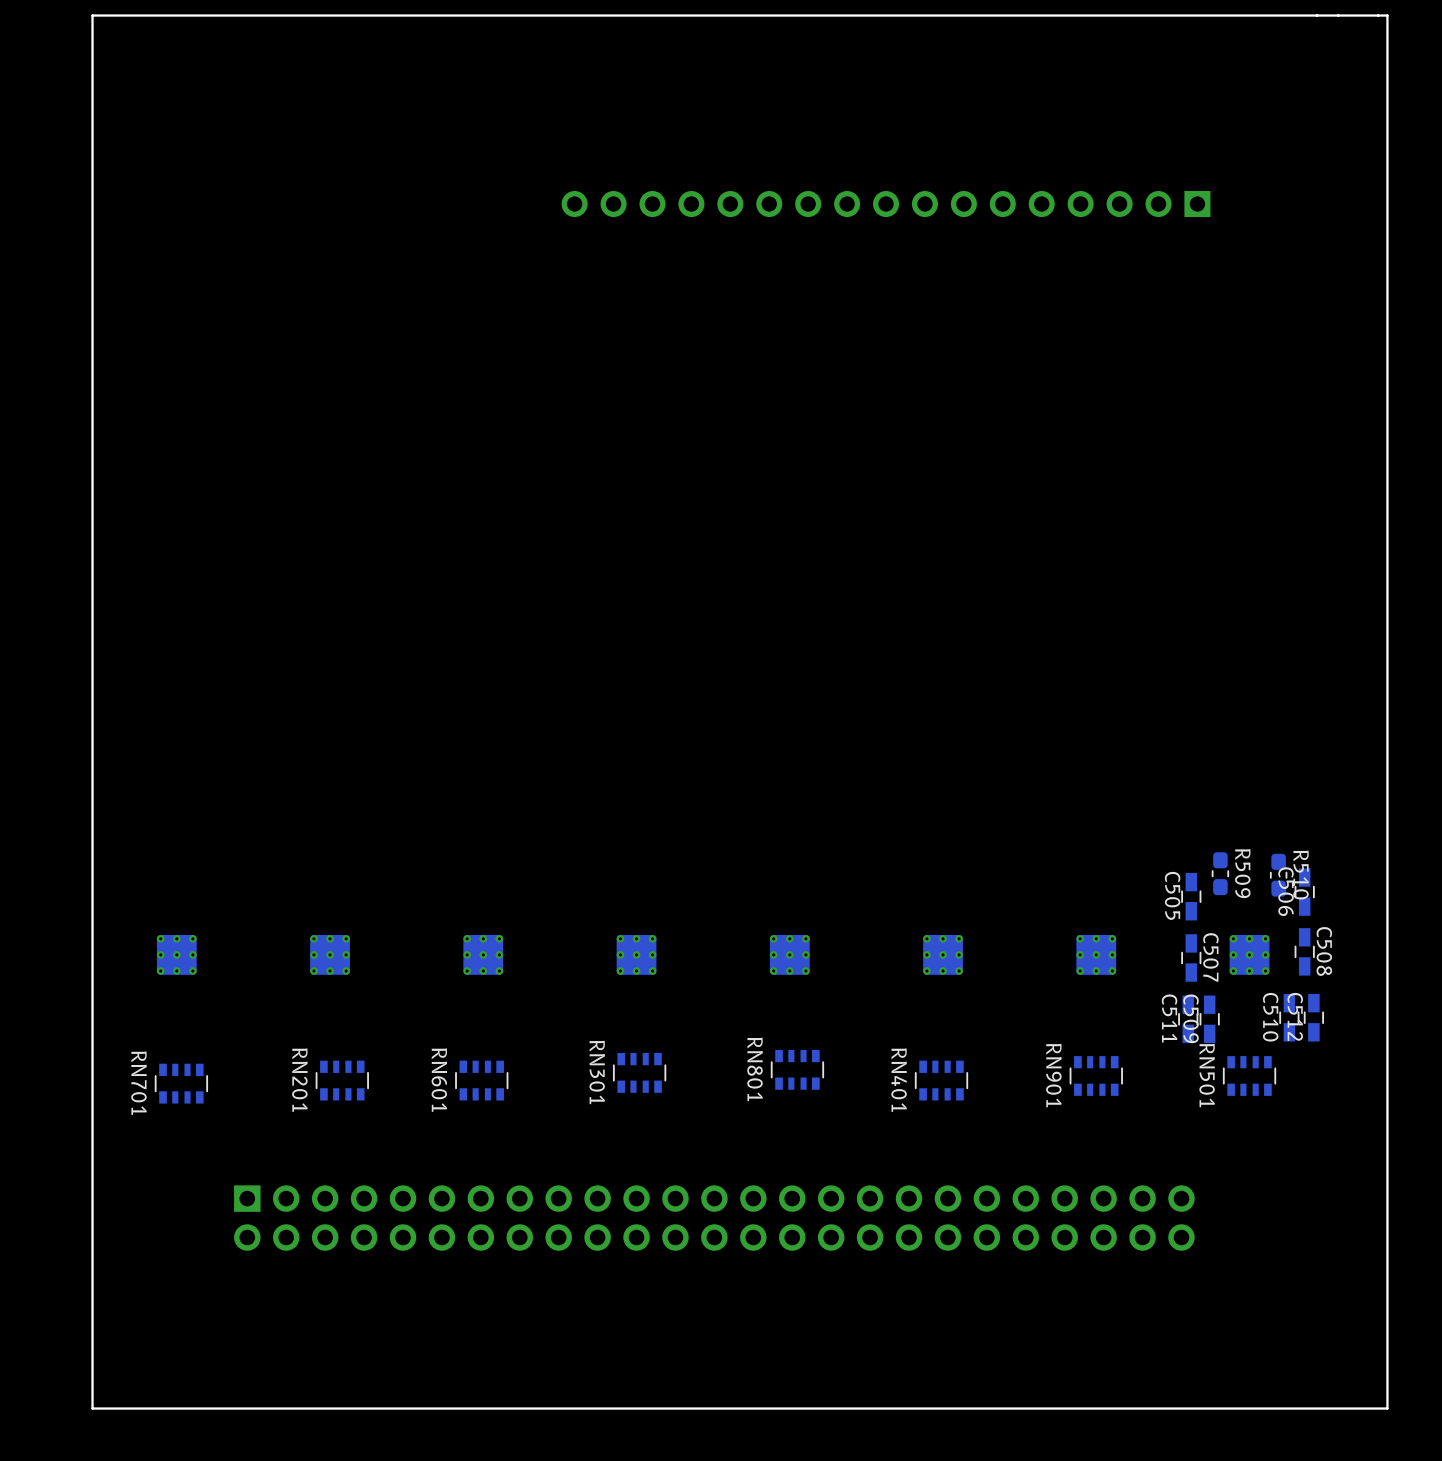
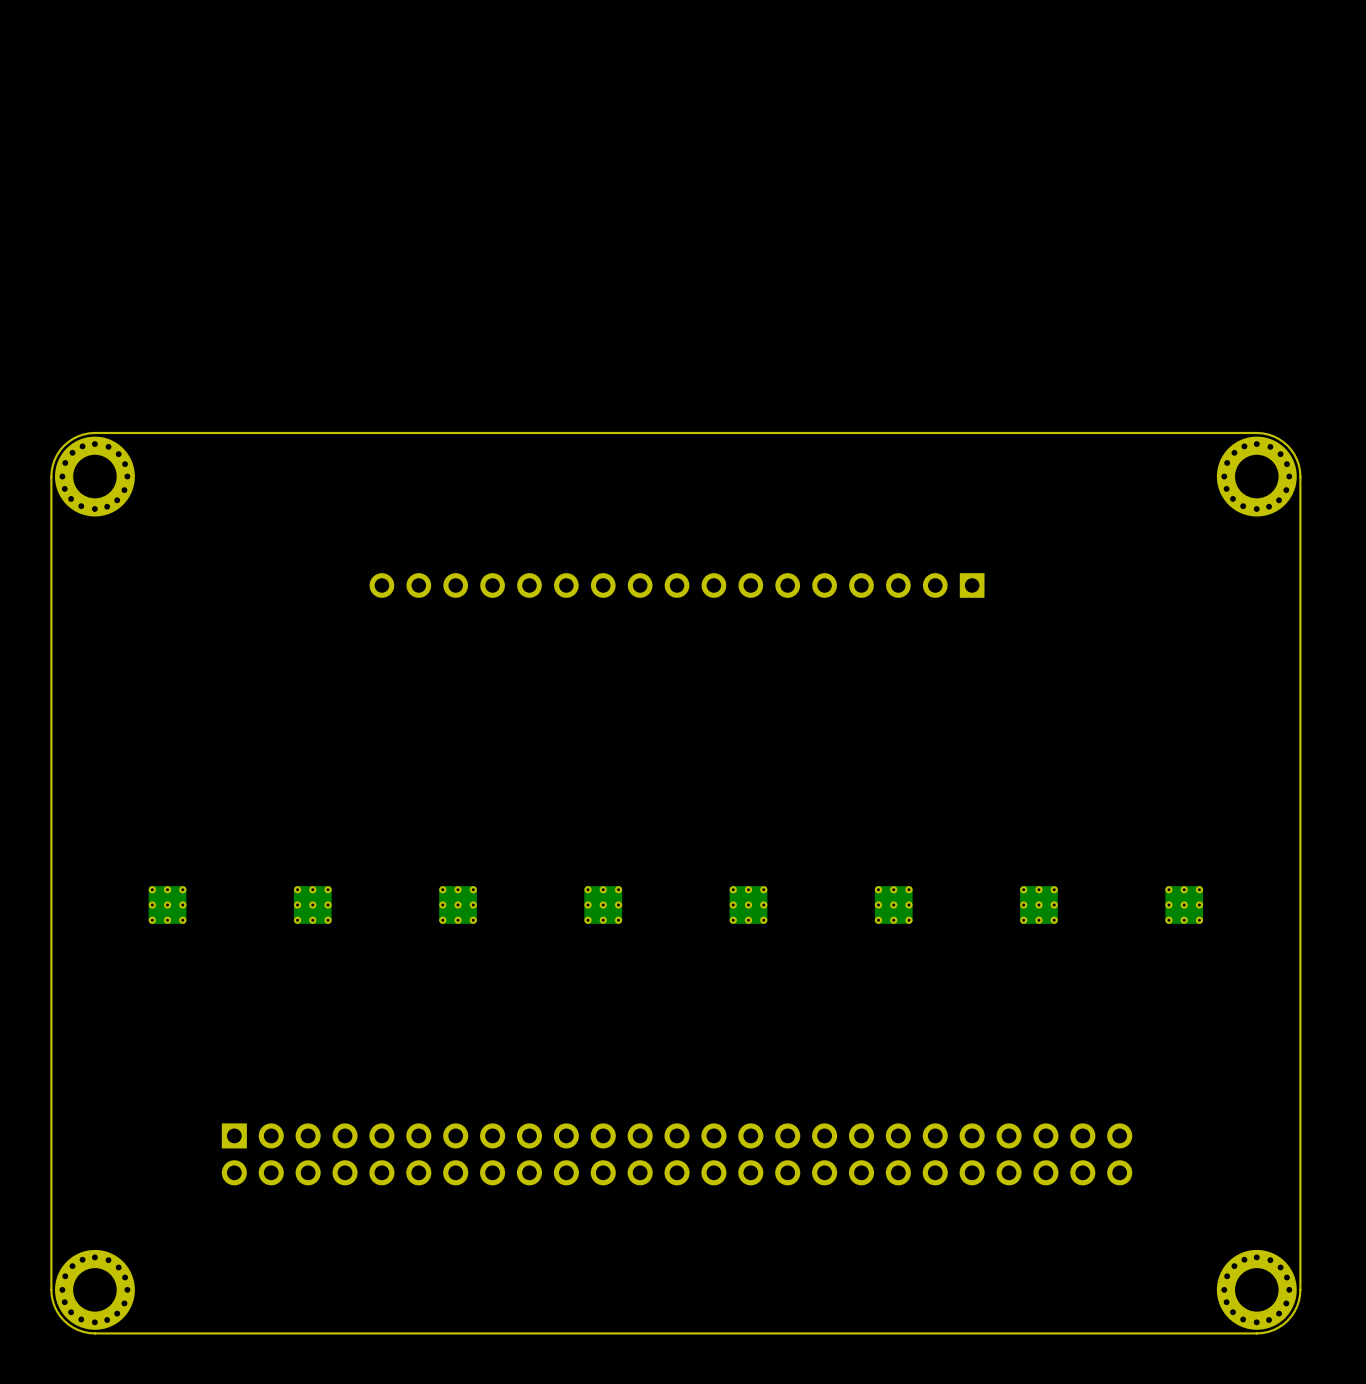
board edge: (1387, 15) (92, 15) (92, 1408) (1387, 1408) (1387, 15) -> (1256, 432) (1273, 436) (1287, 445) (1297, 459) (1300, 476) (1300, 1289) (1294, 1311) (1283, 1324) (1273, 1330) (1256, 1333) (94, 1333) (78, 1330) (60, 1316) (54, 1306) (51, 1289) (51, 476) (54, 459) (68, 441) (78, 436) (94, 432) (1256, 432)
part: (886, 204) -> none
part: none -> (94, 476)
part: none -> (1256, 476)
part: none -> (677, 585)
R509: (1220, 873) -> none
R510: (1278, 875) -> none
C506: (1304, 892) -> none
C505: (1191, 896) -> none
C508: (1304, 951) -> none
C507: (1191, 957) -> none
C510: (1289, 1017) -> none
C512: (1313, 1017) -> none
C511: (1188, 1019) -> none
C509: (1209, 1019) -> none
RN801: (797, 1069) -> none
RN301: (639, 1072) -> none
RN901: (1096, 1075) -> none
RN501: (1249, 1075) -> none
RN201: (342, 1080) -> none
RN601: (481, 1080) -> none
RN401: (941, 1080) -> none
RN701: (181, 1083) -> none
part: none -> (94, 1289)
part: none -> (1256, 1289)

